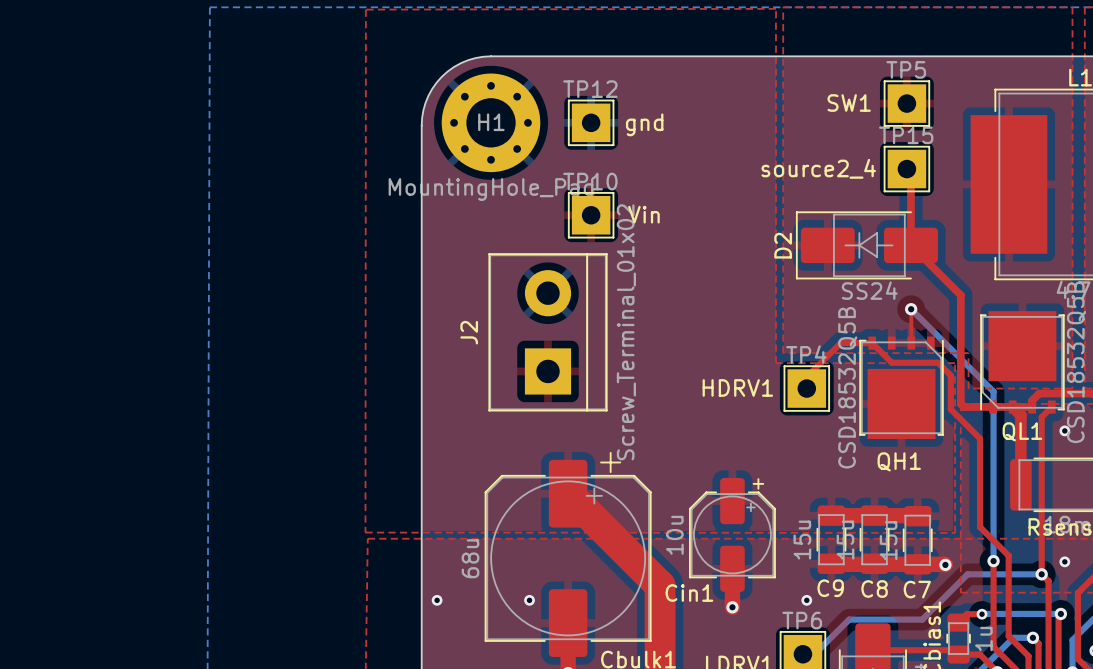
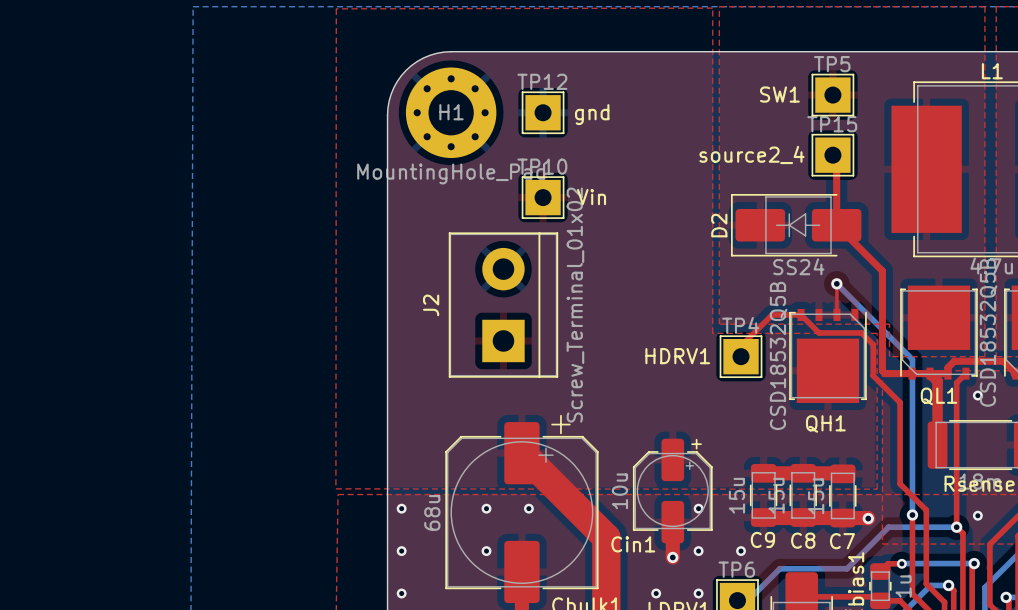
via: none -> (401, 508)
via: none -> (486, 508)
via: none -> (528, 508)
via: none -> (698, 508)
via: none -> (698, 551)
via: none -> (401, 593)
via: none -> (656, 593)
via: none -> (698, 593)

